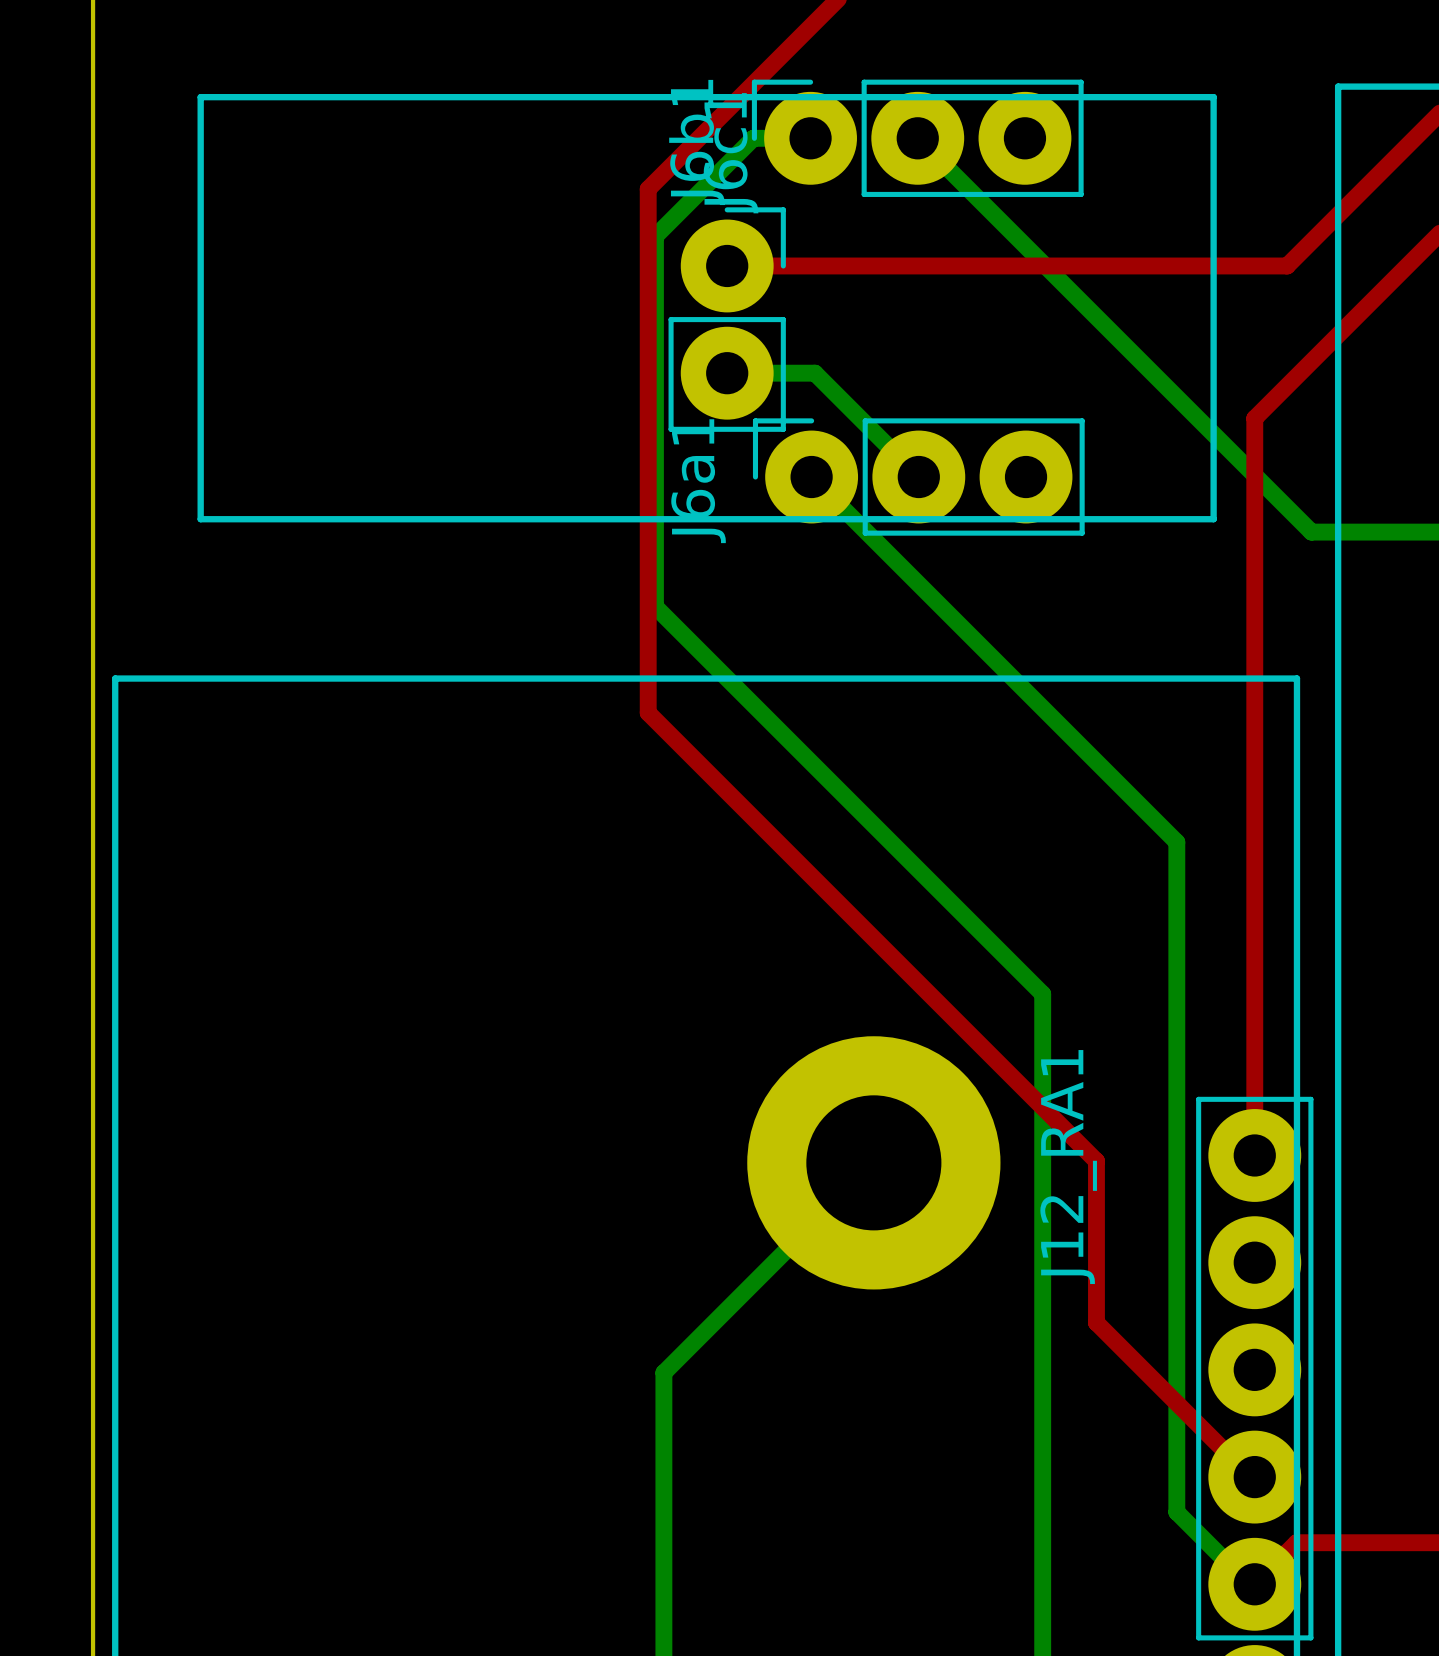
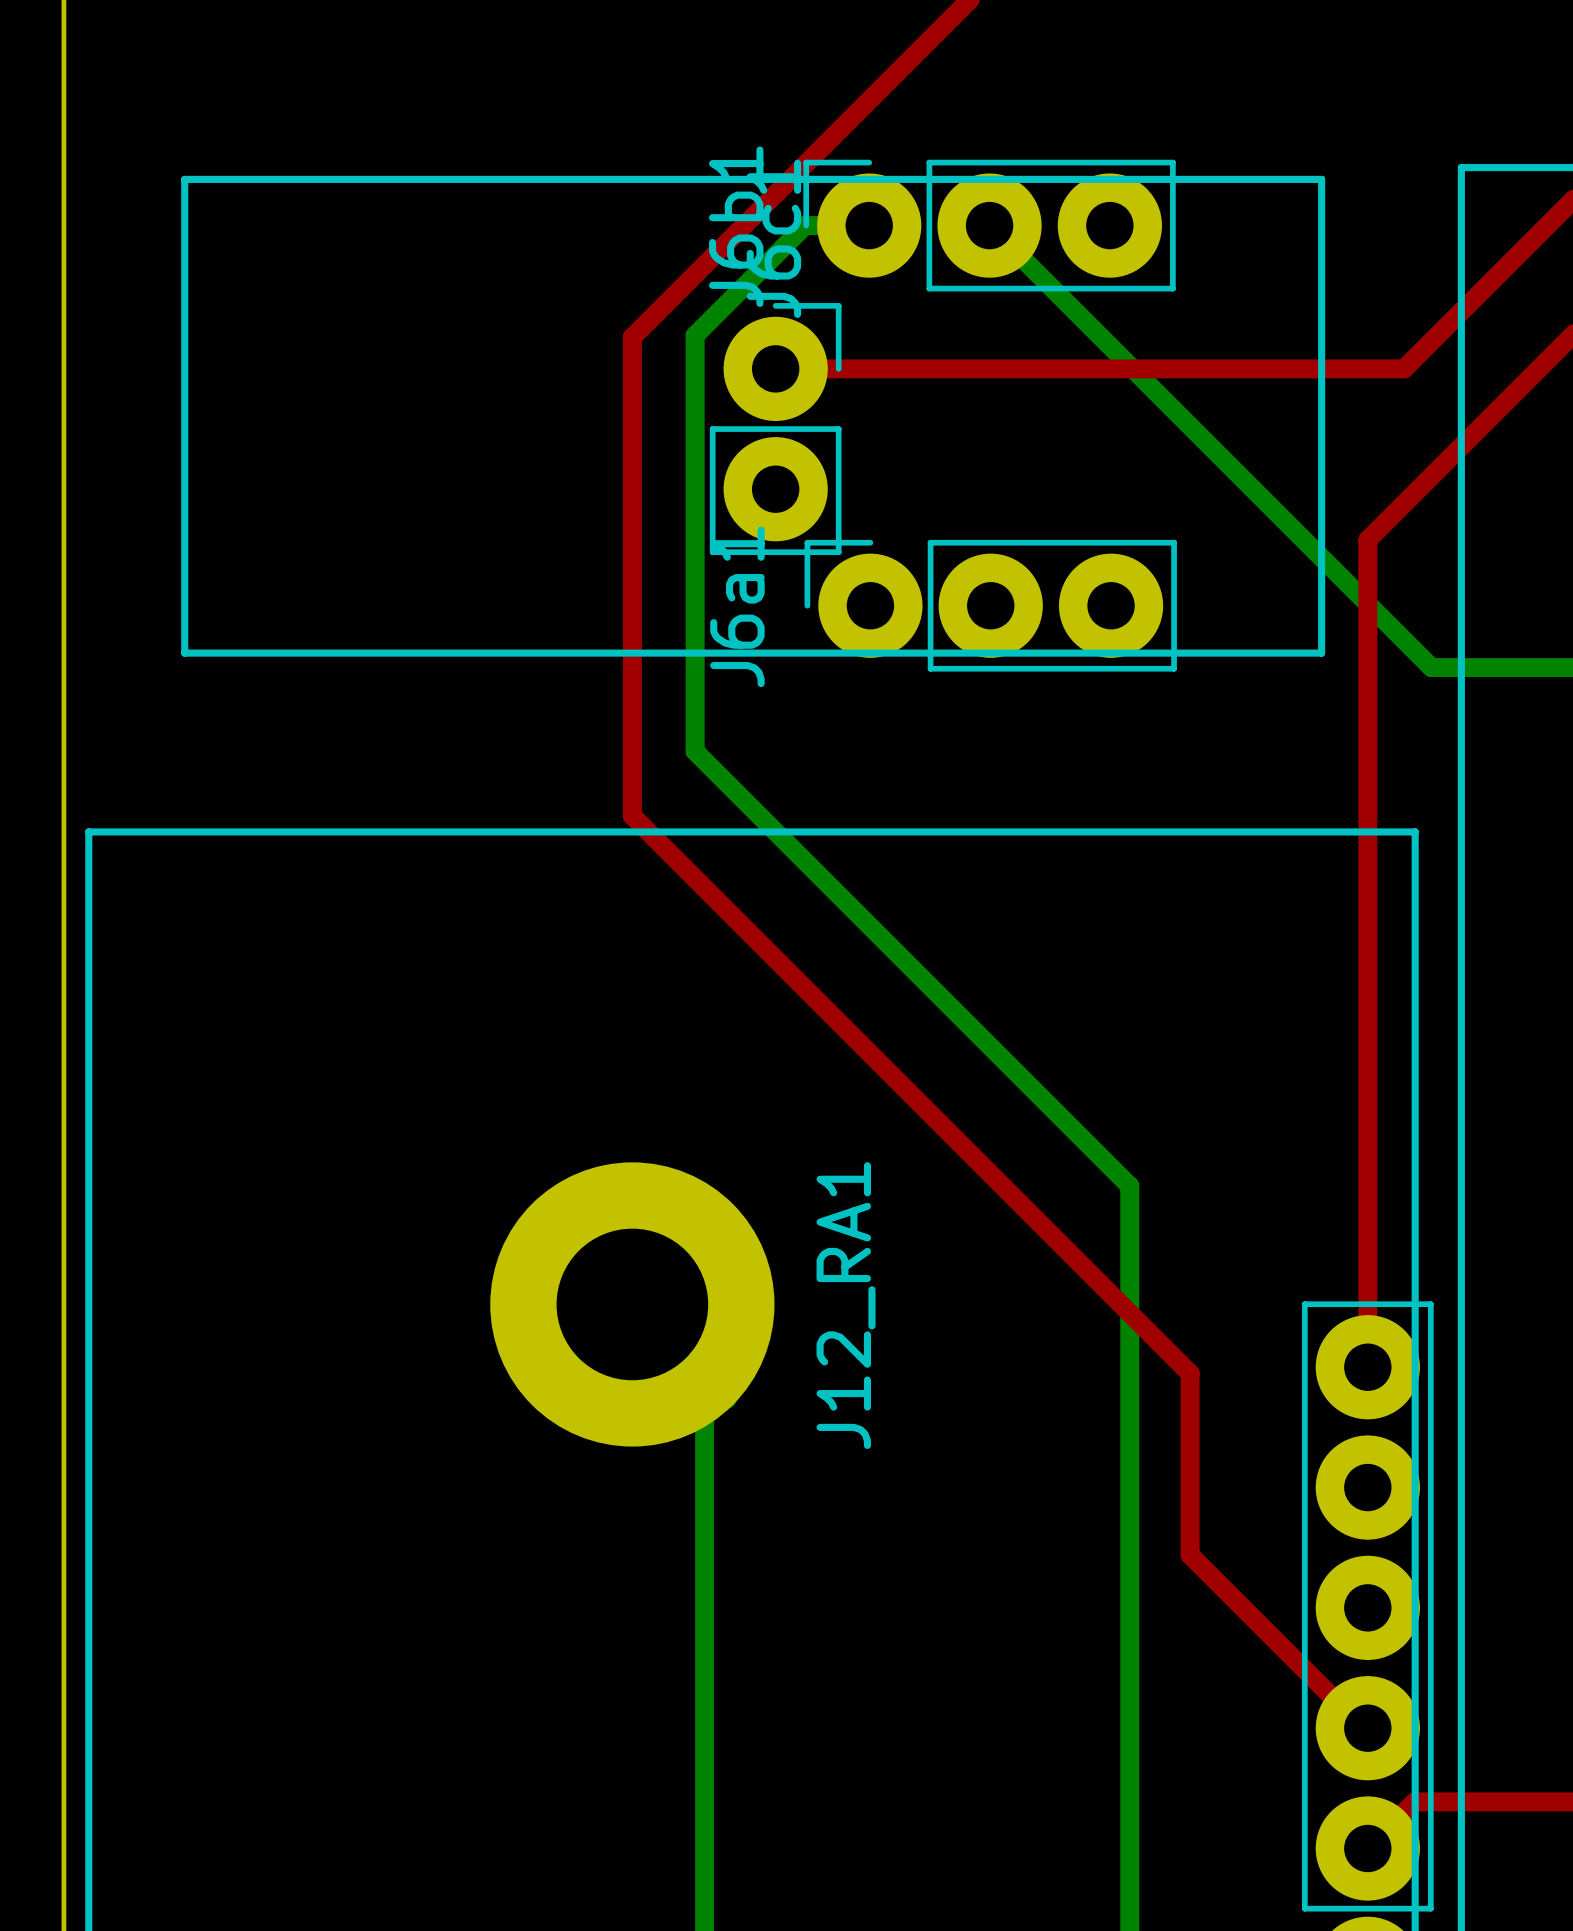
top track: (648, 189) (648, 712) -> (687, 282) (632, 337) (632, 815) (687, 870)
bottom track: (727, 373) (814, 373) (918, 477) -> none
bottom track: (811, 477) (1176, 842) (1176, 1512) (1248, 1584) -> none
bottom track: (873, 1162) (663, 1372) -> (704, 1376) (704, 1611)
J12_RA1 position: (873, 1162) -> (632, 1304)

